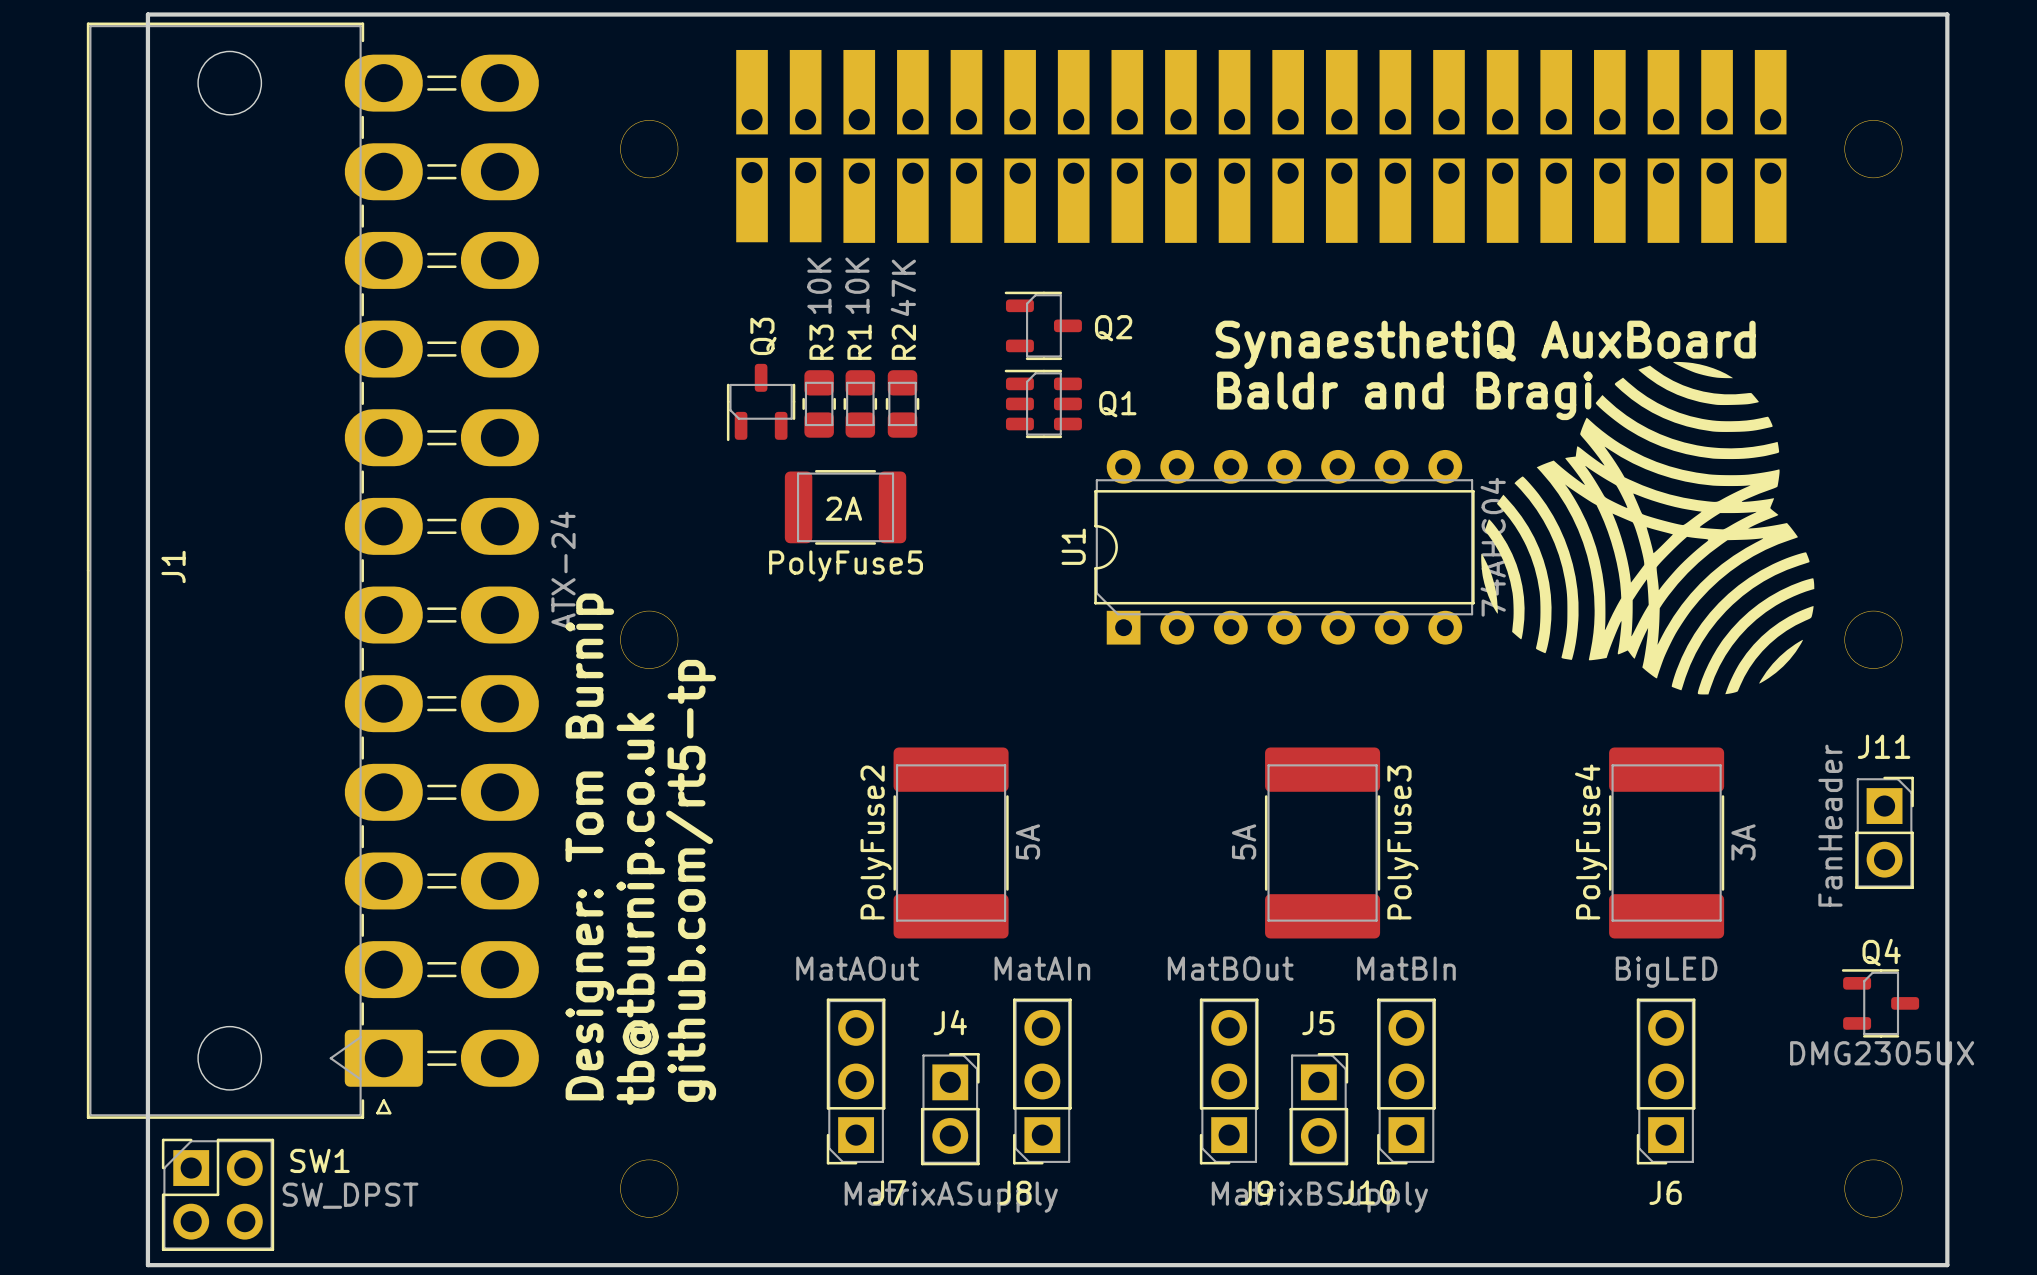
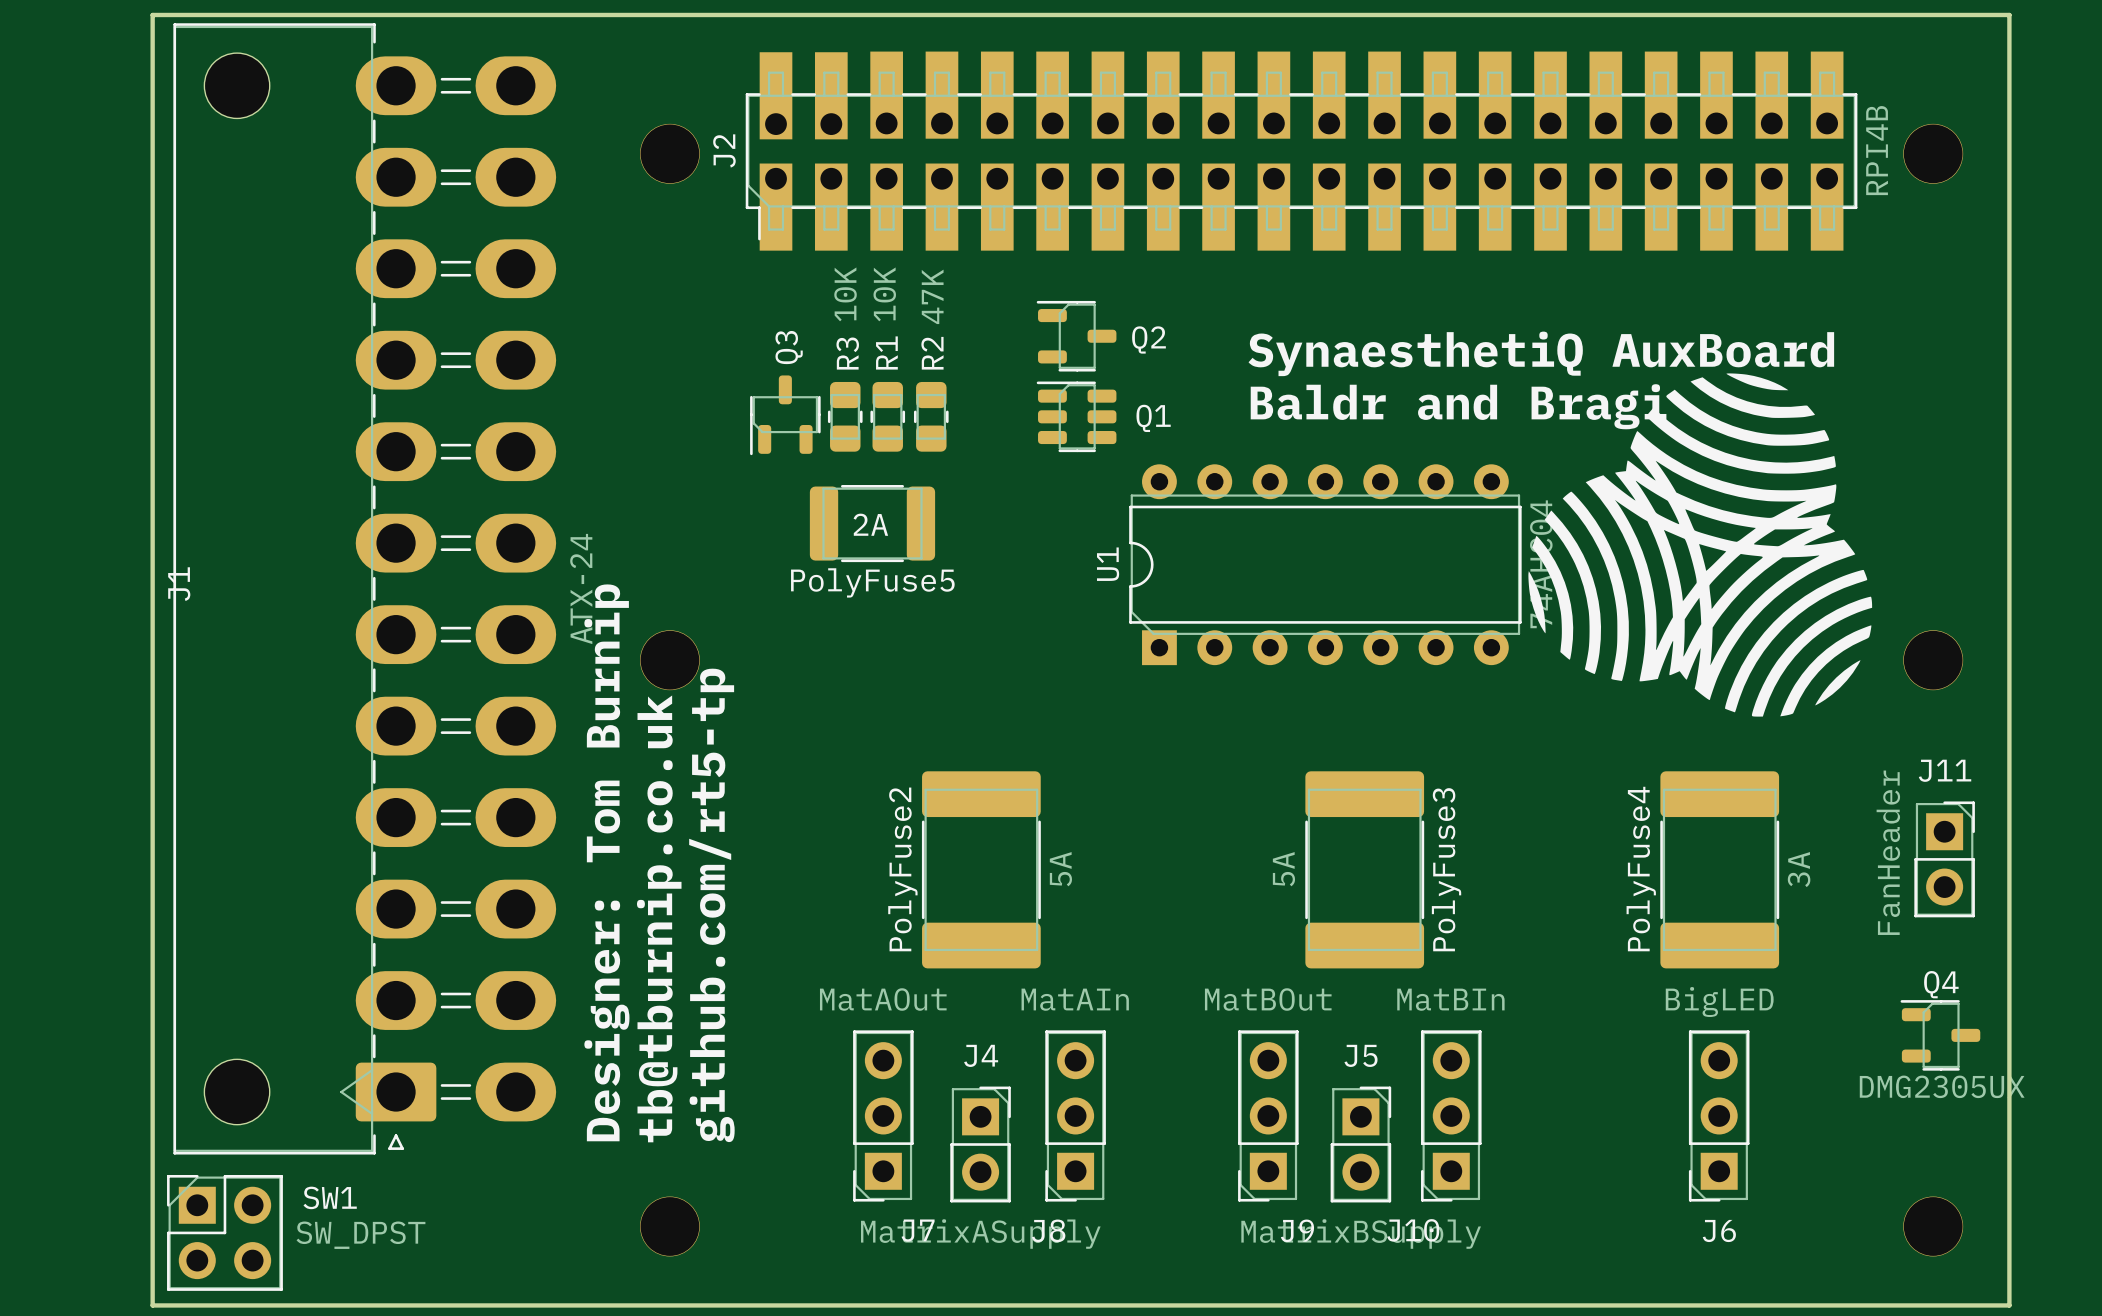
J1 footprint: [86, 22, 539, 1119] -> [173, 23, 557, 1155]
J2 side: bottom (1261, 146) -> top (1301, 151)

